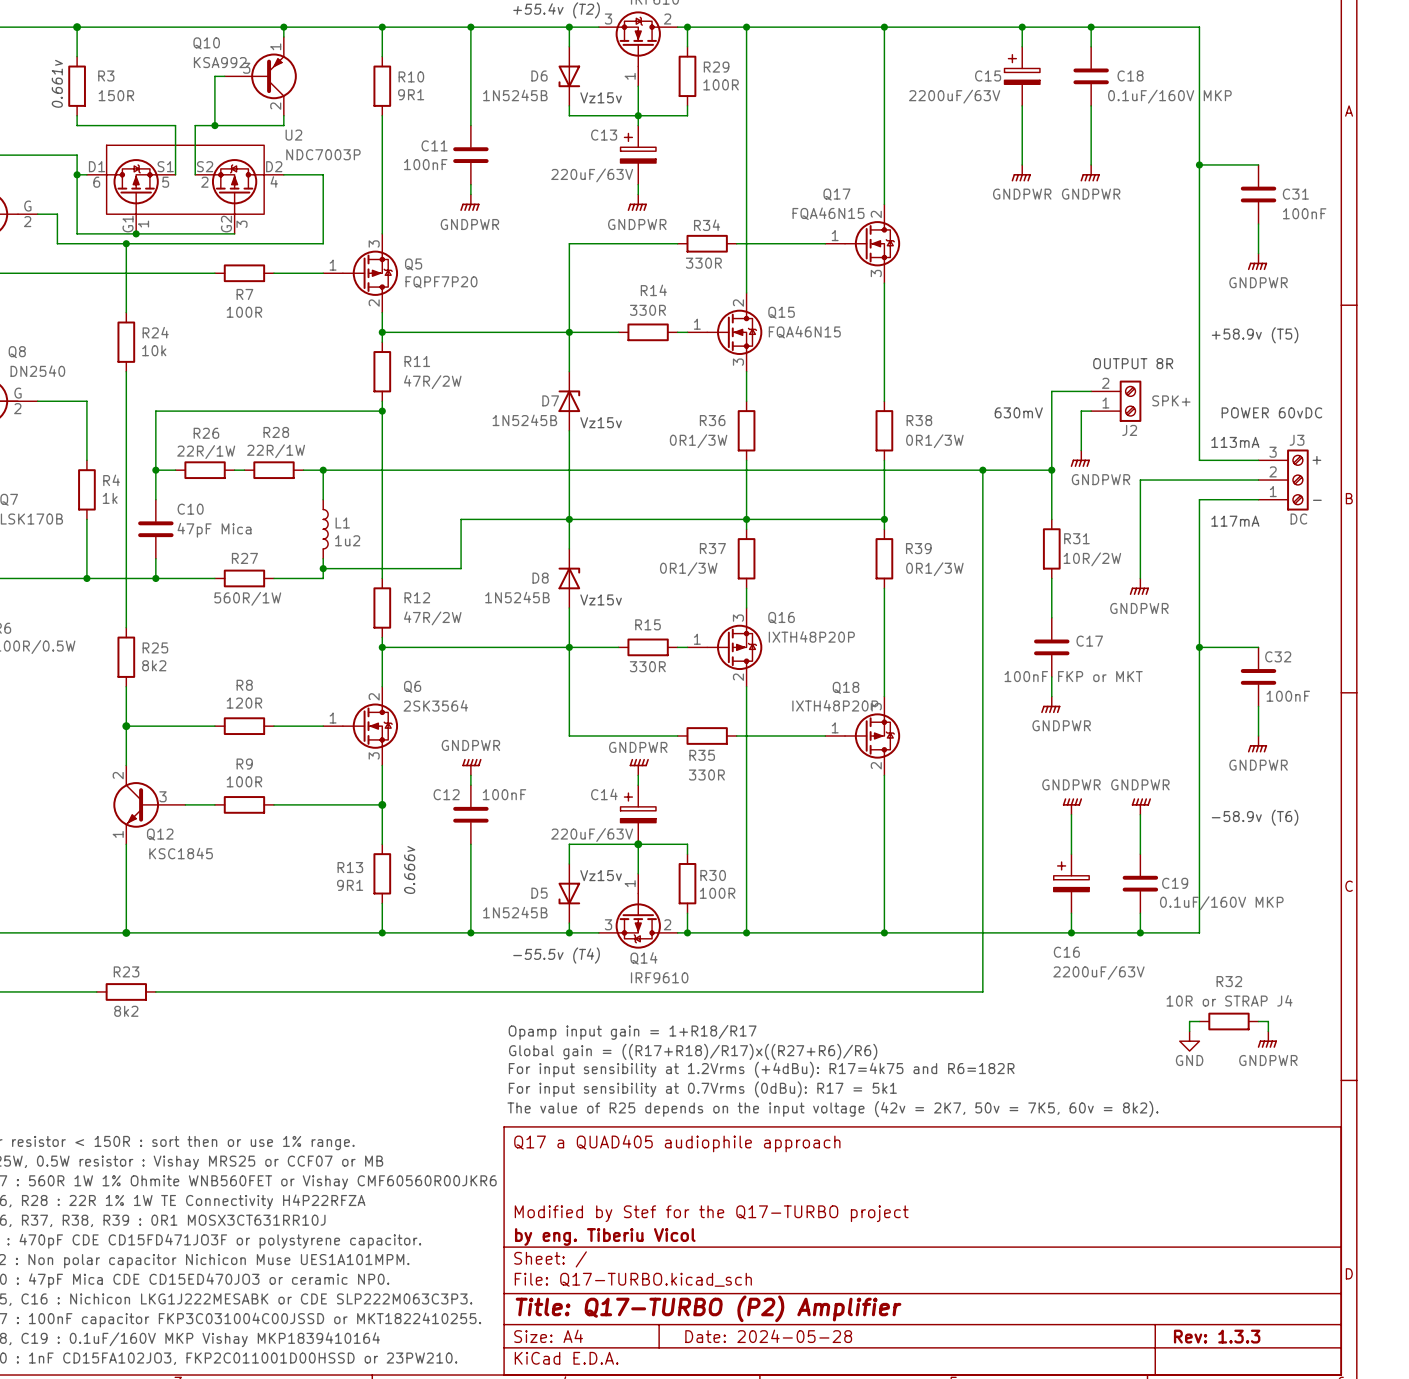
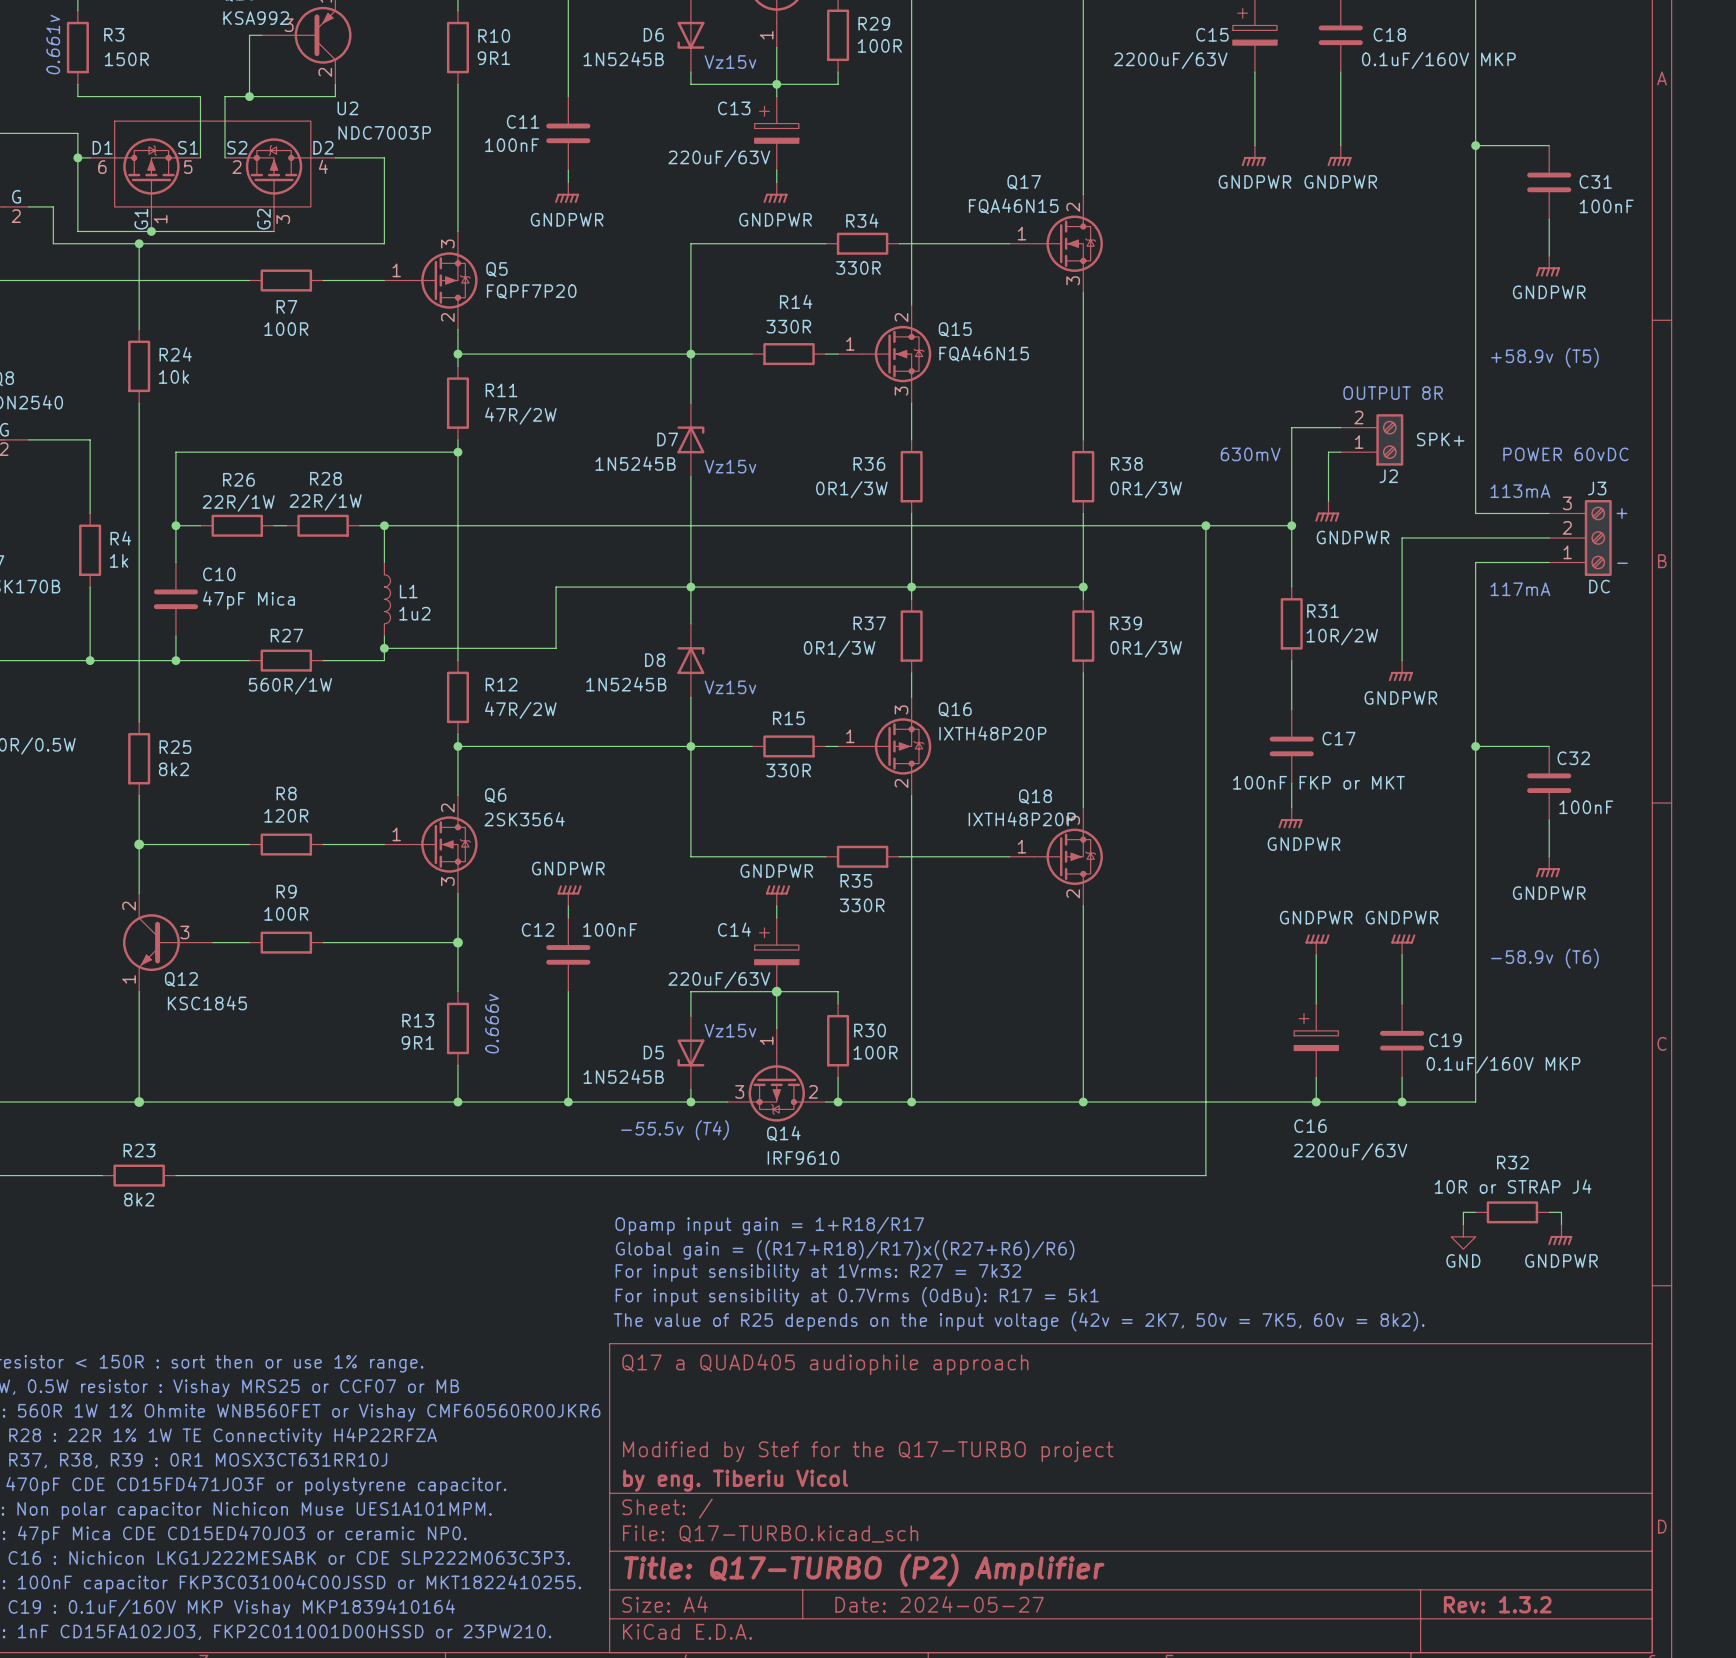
text: For input sensibility at 1.2Vrms (+4dBu): R17=4k75 and R6=182R (761, 1069) -> For input sensibility at 1Vrms: R27 = 7k32 (818, 1273)
title block: Date: 2024-05-28 (768, 1336) -> Date: 2024-05-27 (939, 1604)
title block: Rev: 1.3.3 (1217, 1336) -> Rev: 1.3.2 (1497, 1604)

